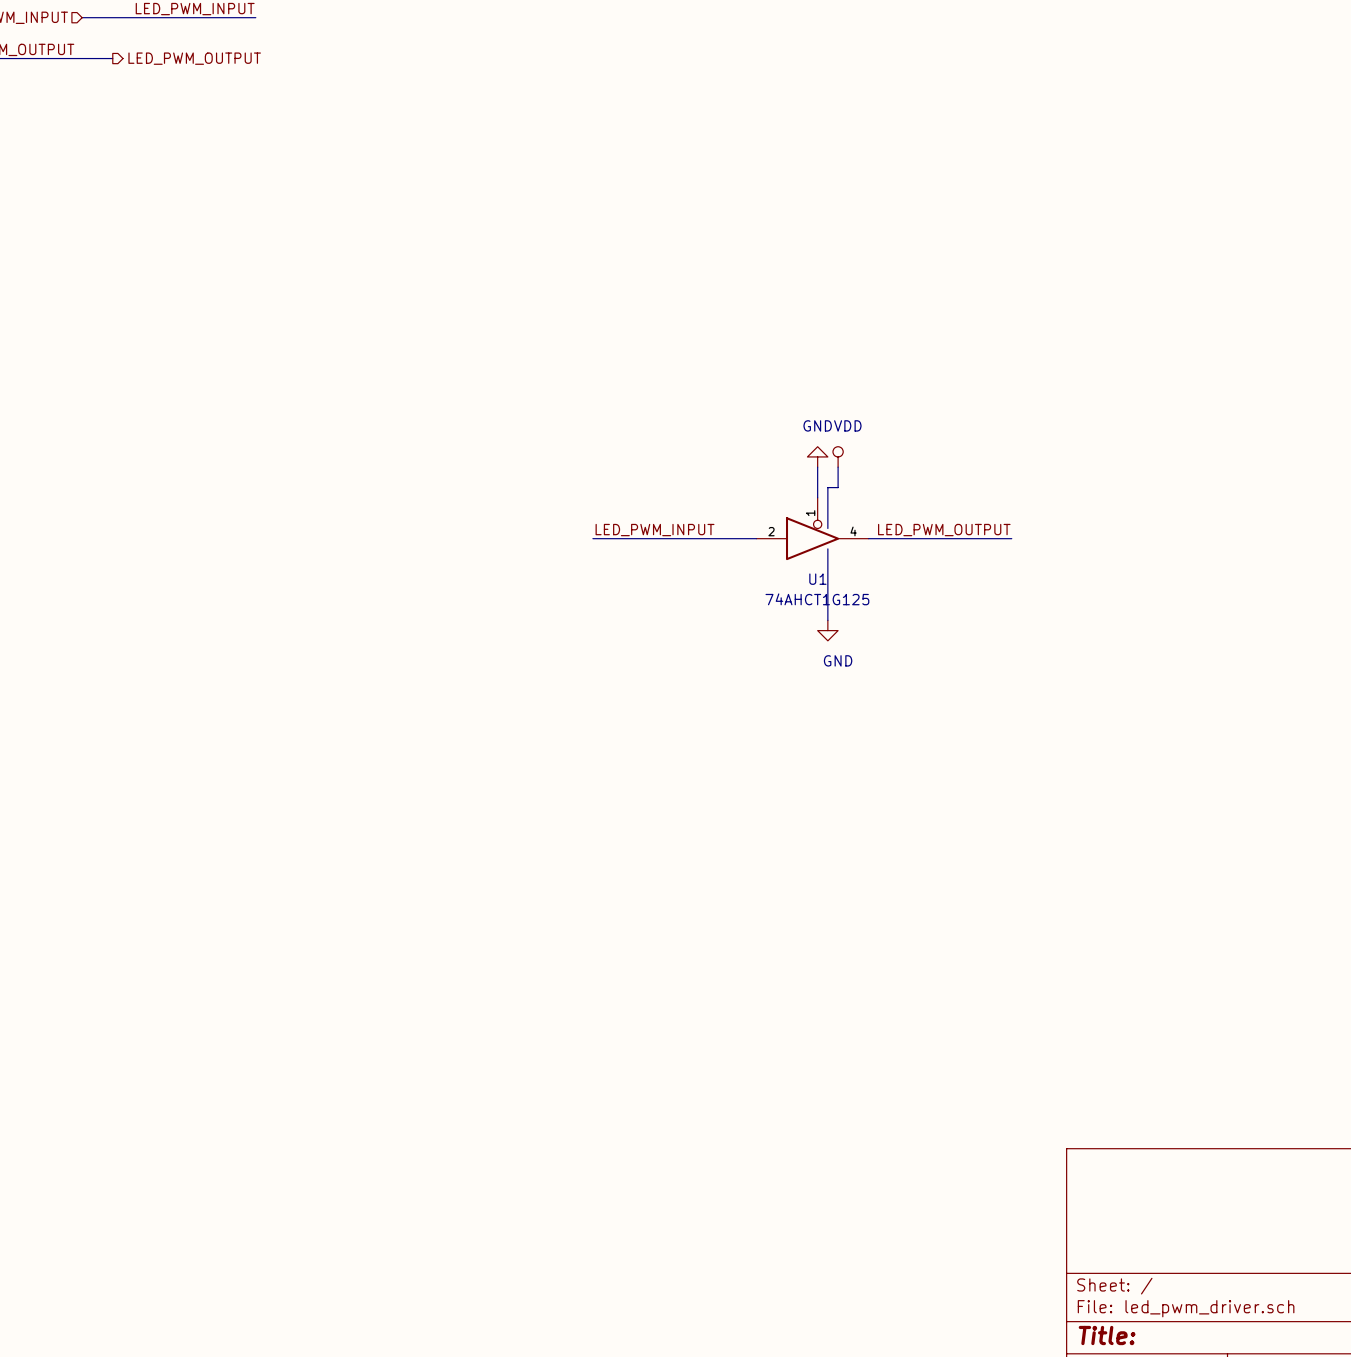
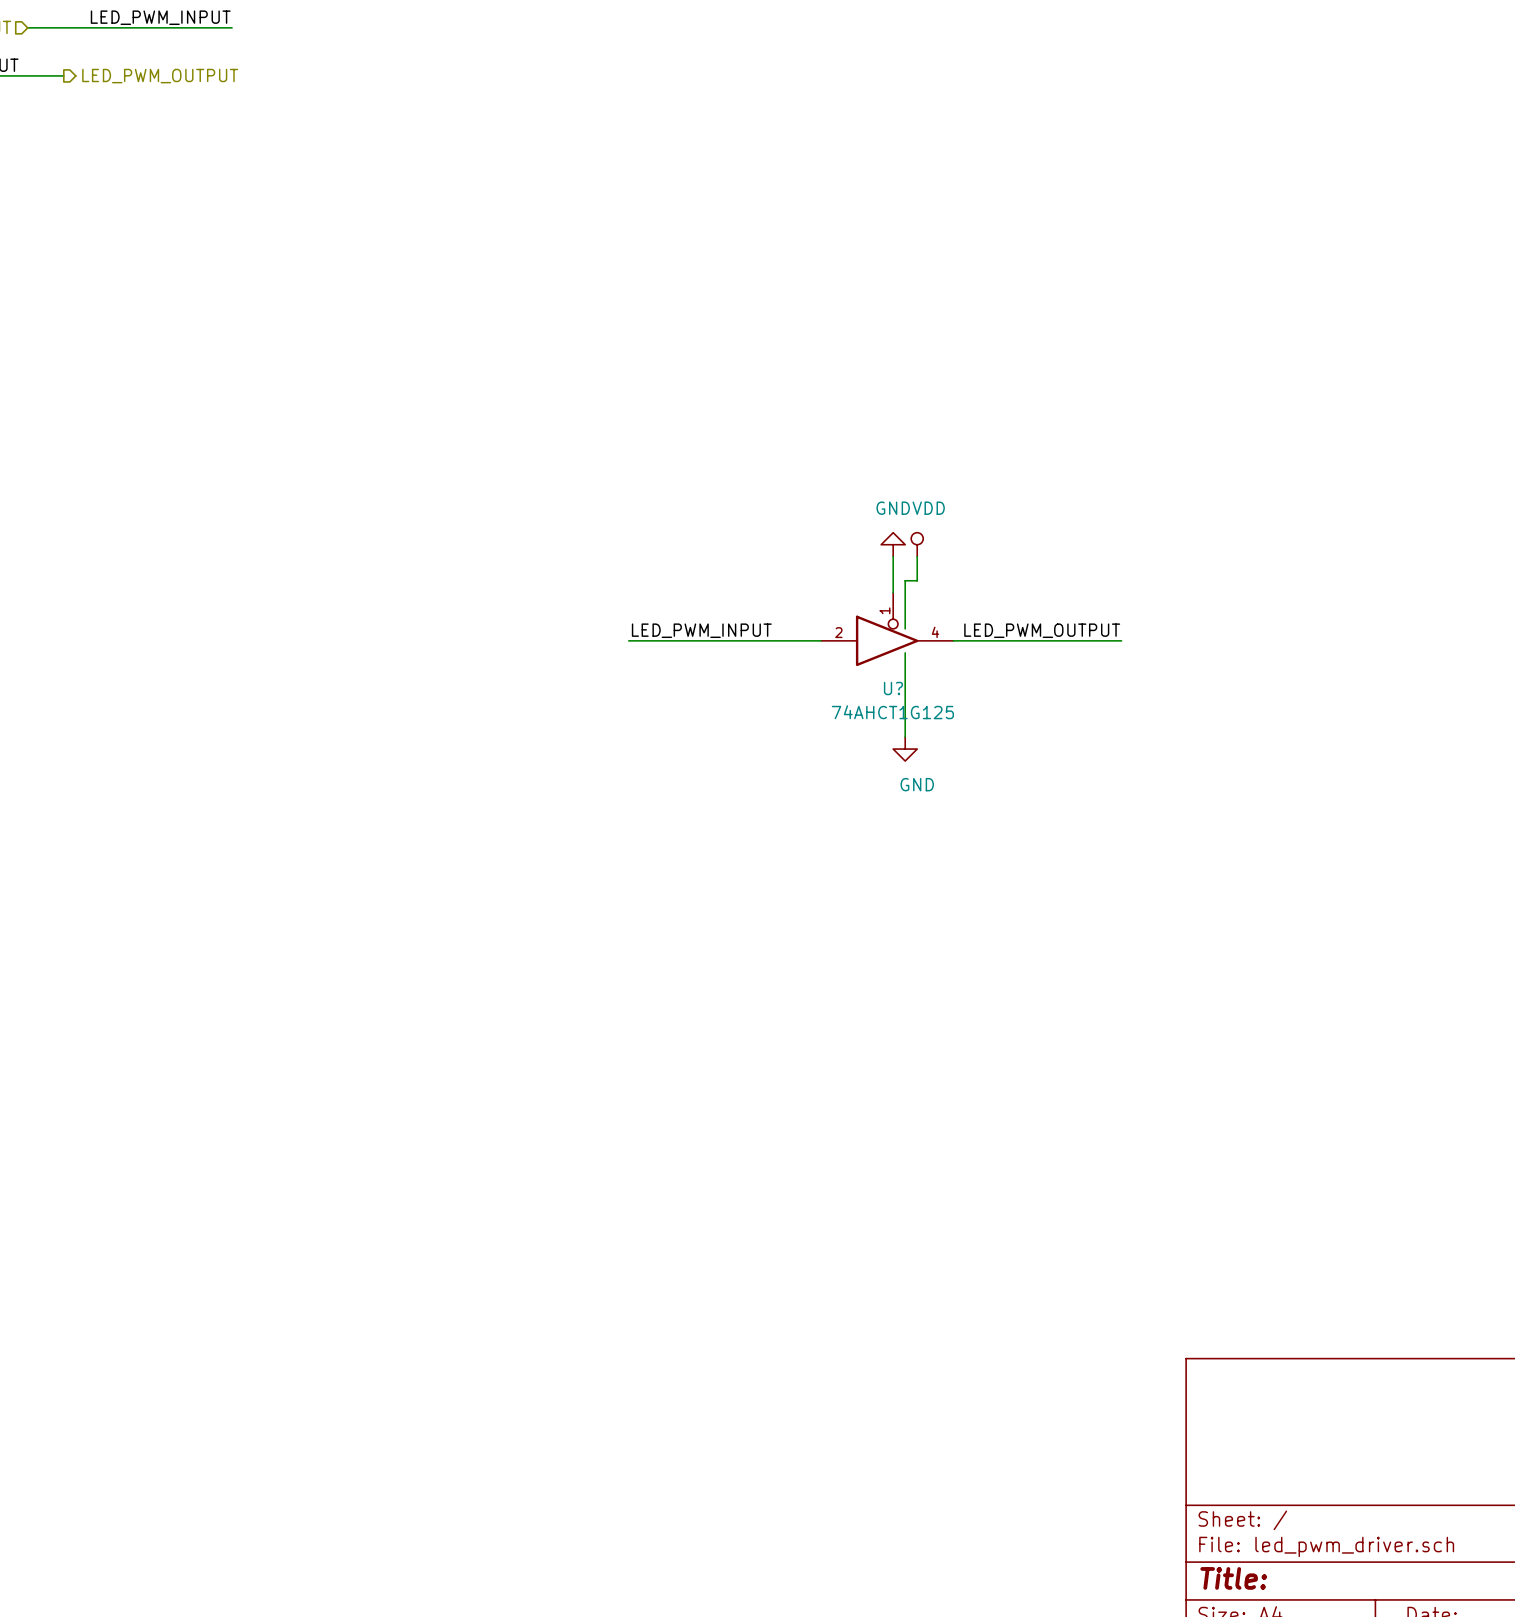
U1 name: U1 (817, 579) -> U? (893, 688)

